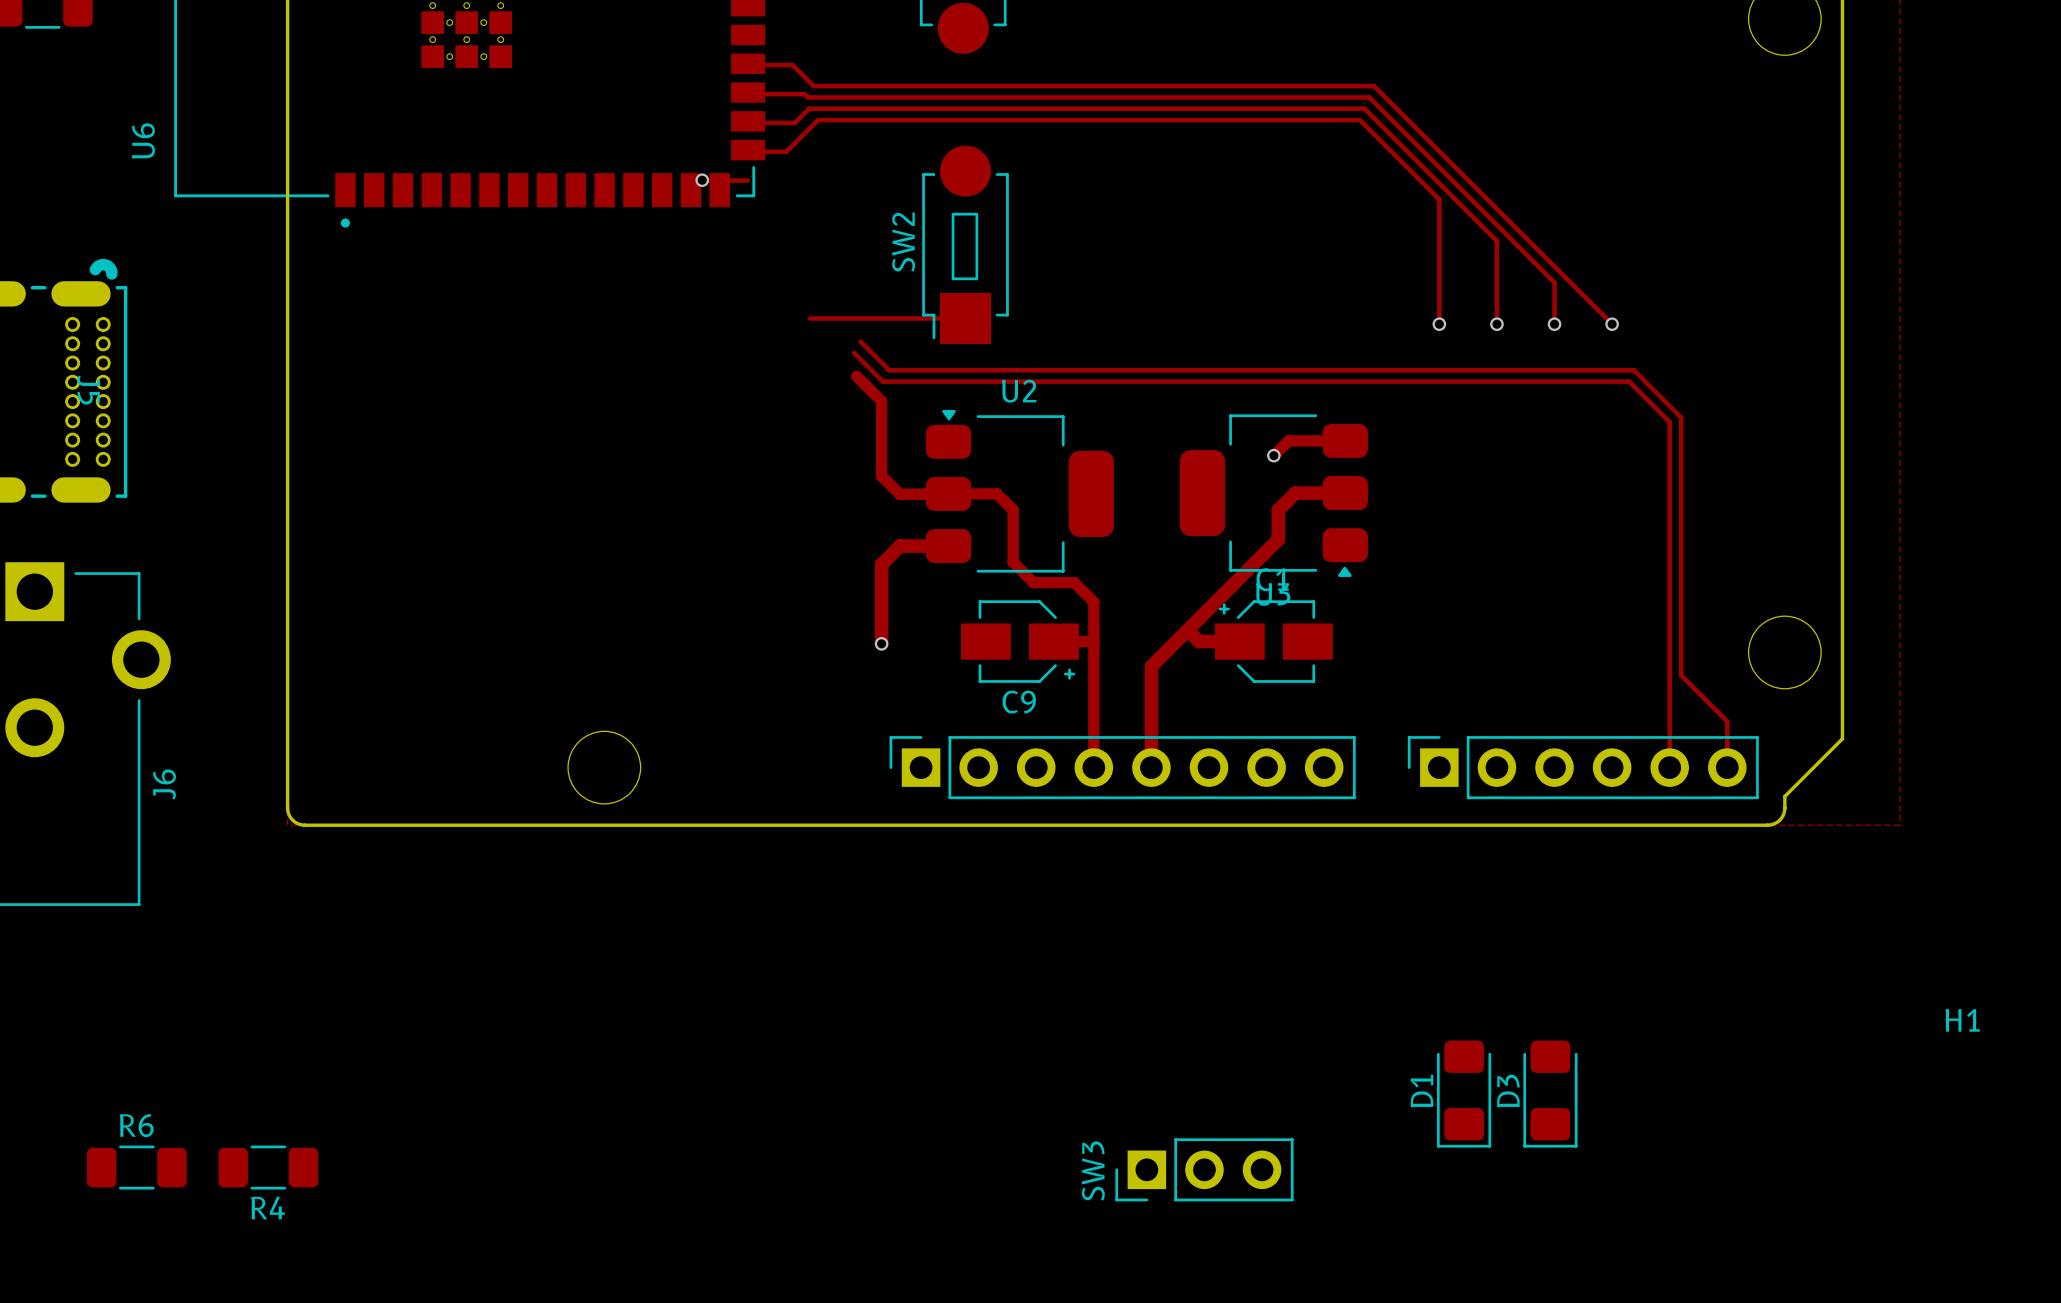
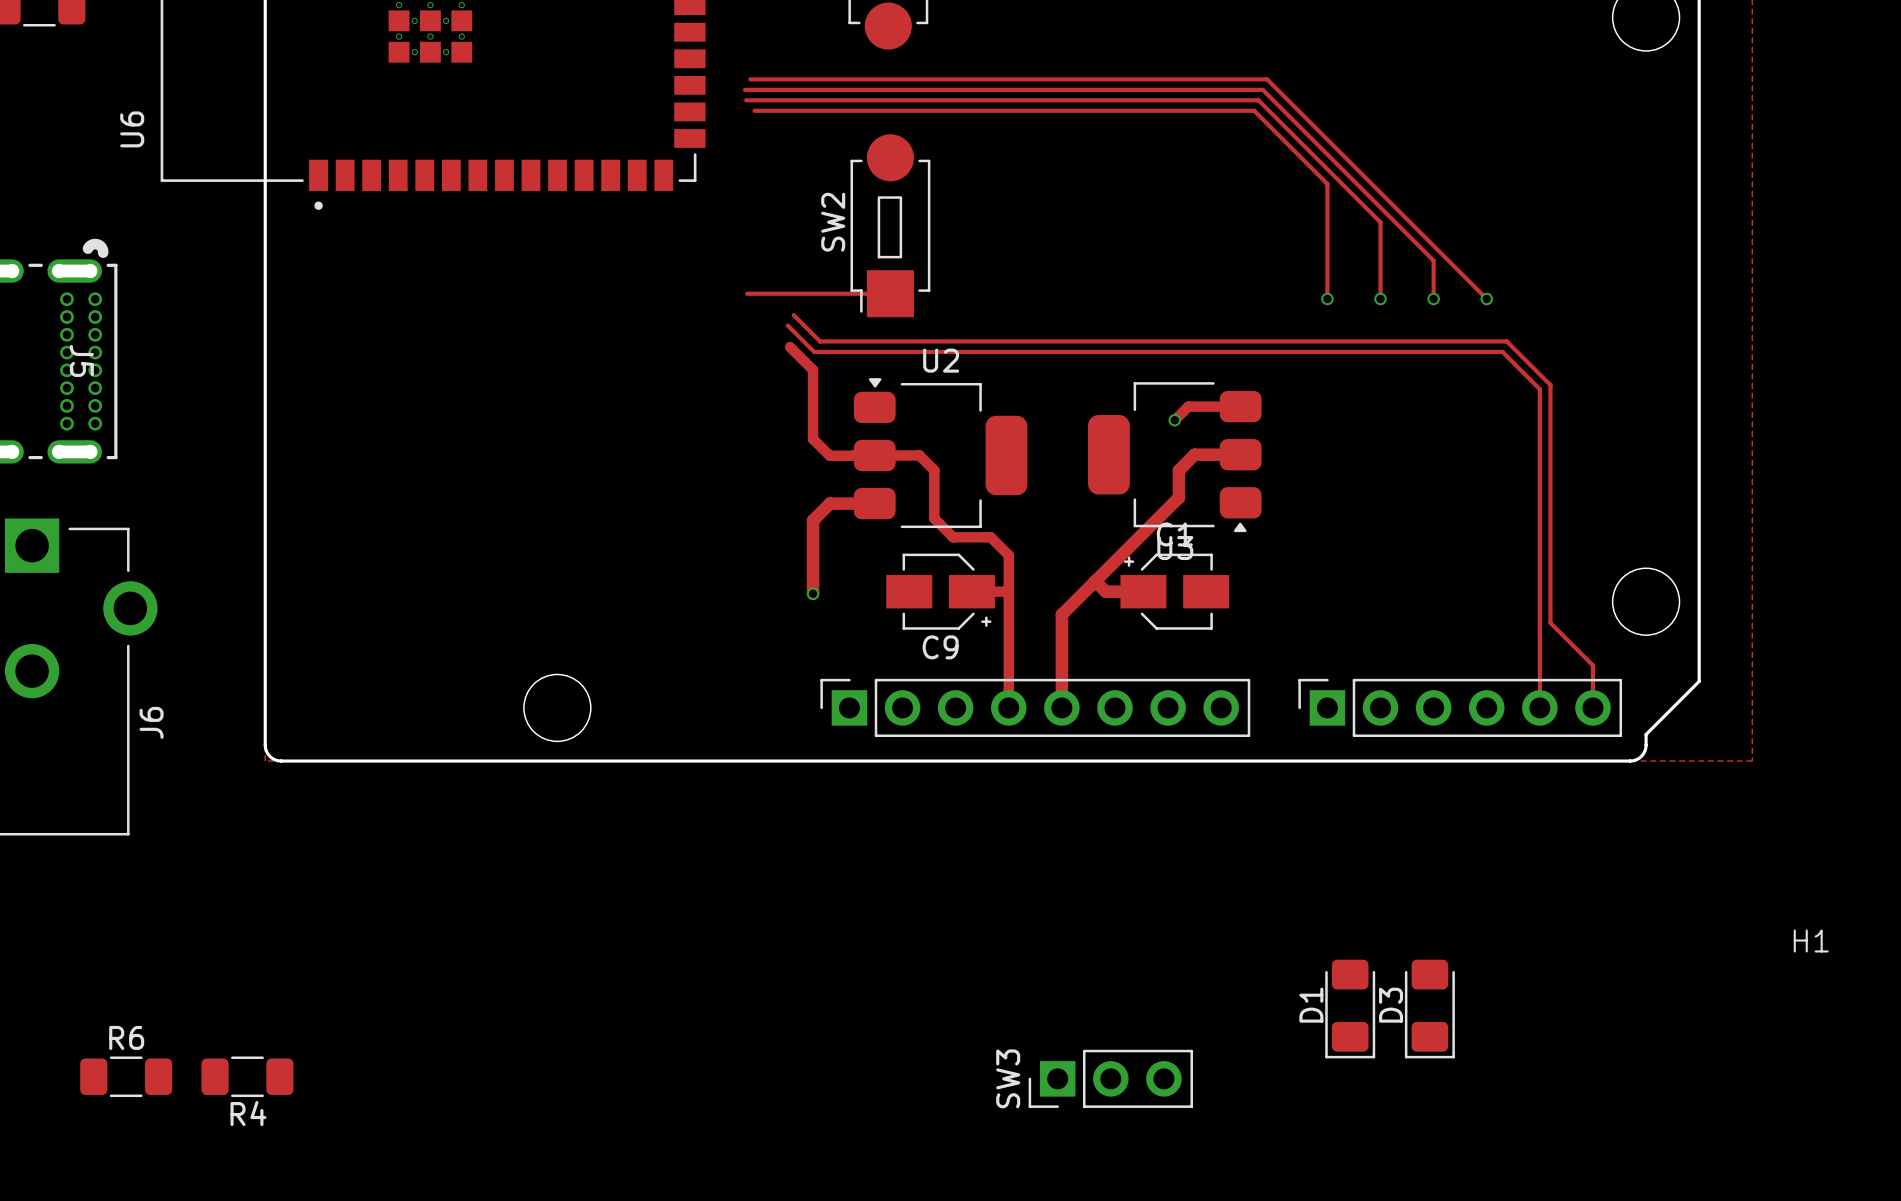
track: (748, 65) (792, 65) (813, 86) -> none
track: (747, 94) (804, 94) (807, 97) -> none
track: (809, 108) (794, 122) (747, 122) -> none
track: (818, 120) (786, 151) (747, 151) -> none
track: (702, 180) (747, 180) -> none
via: (702, 180) -> none

